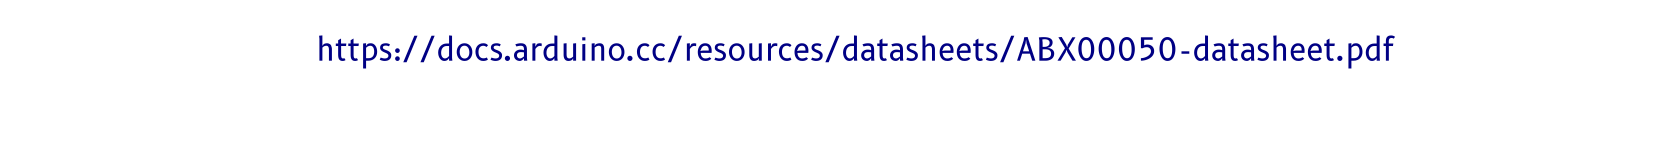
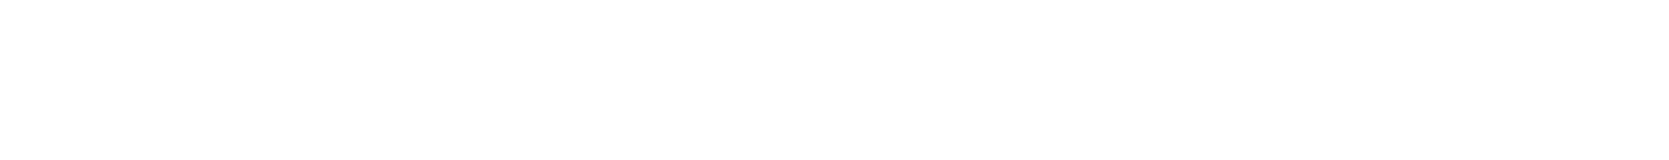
text: https://docs.arduino.cc/resources/datasheets/ABX00050-datasheet.pdf (857, 51) -> none

